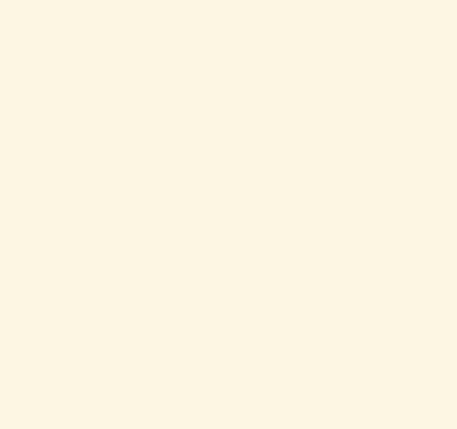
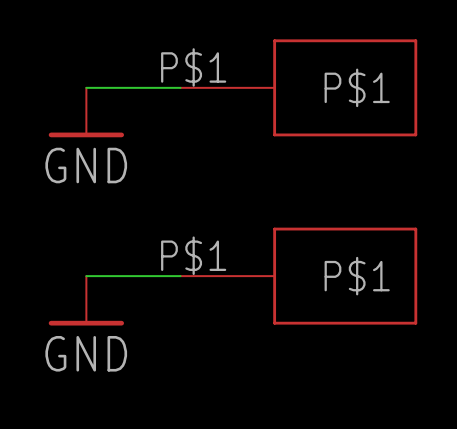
wire: none -> (86, 87) (180, 87)
part: none -> (298, 87)
power symbol: none -> GND (86, 112)
wire: none -> (86, 276) (180, 276)
part: none -> (298, 276)
power symbol: none -> GND (86, 300)

